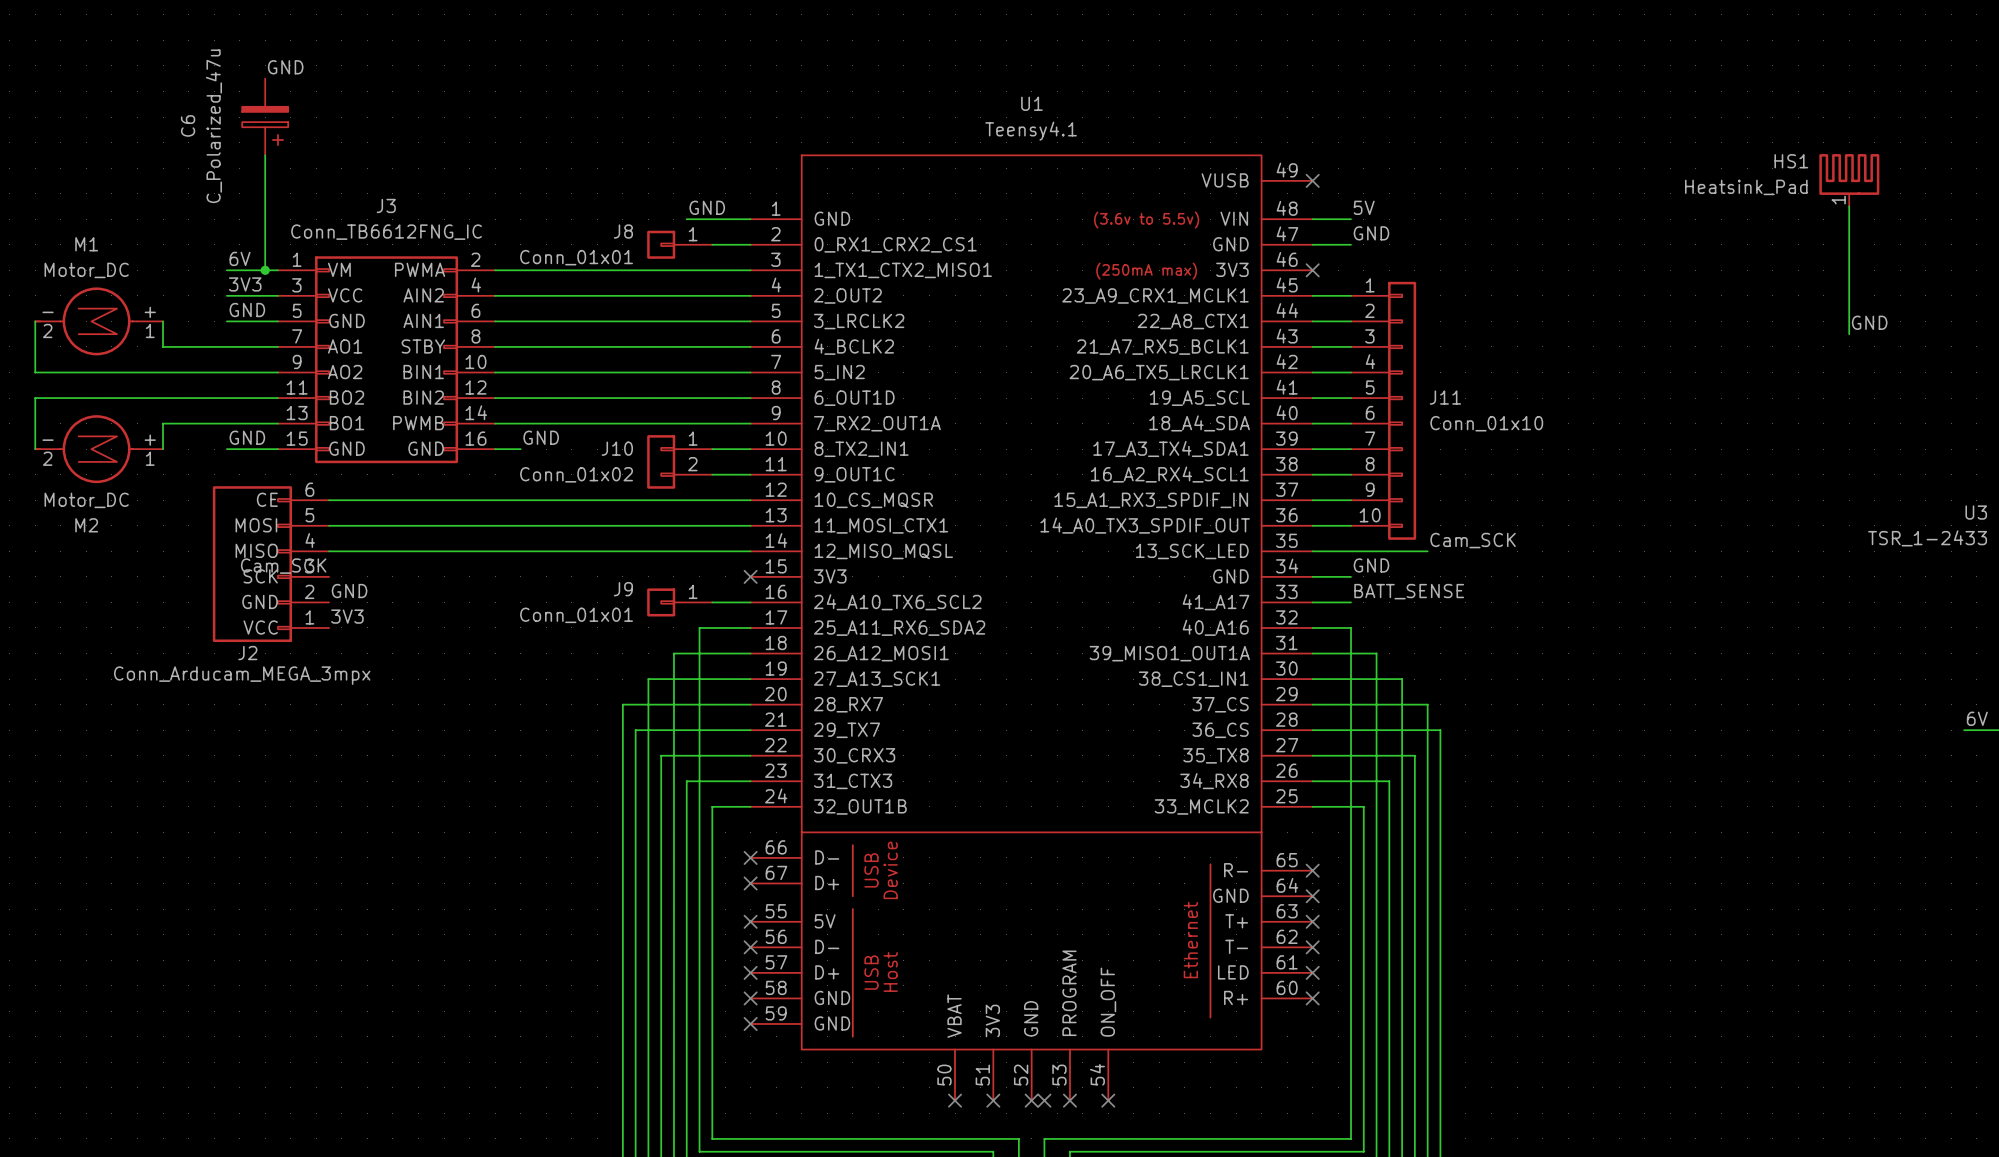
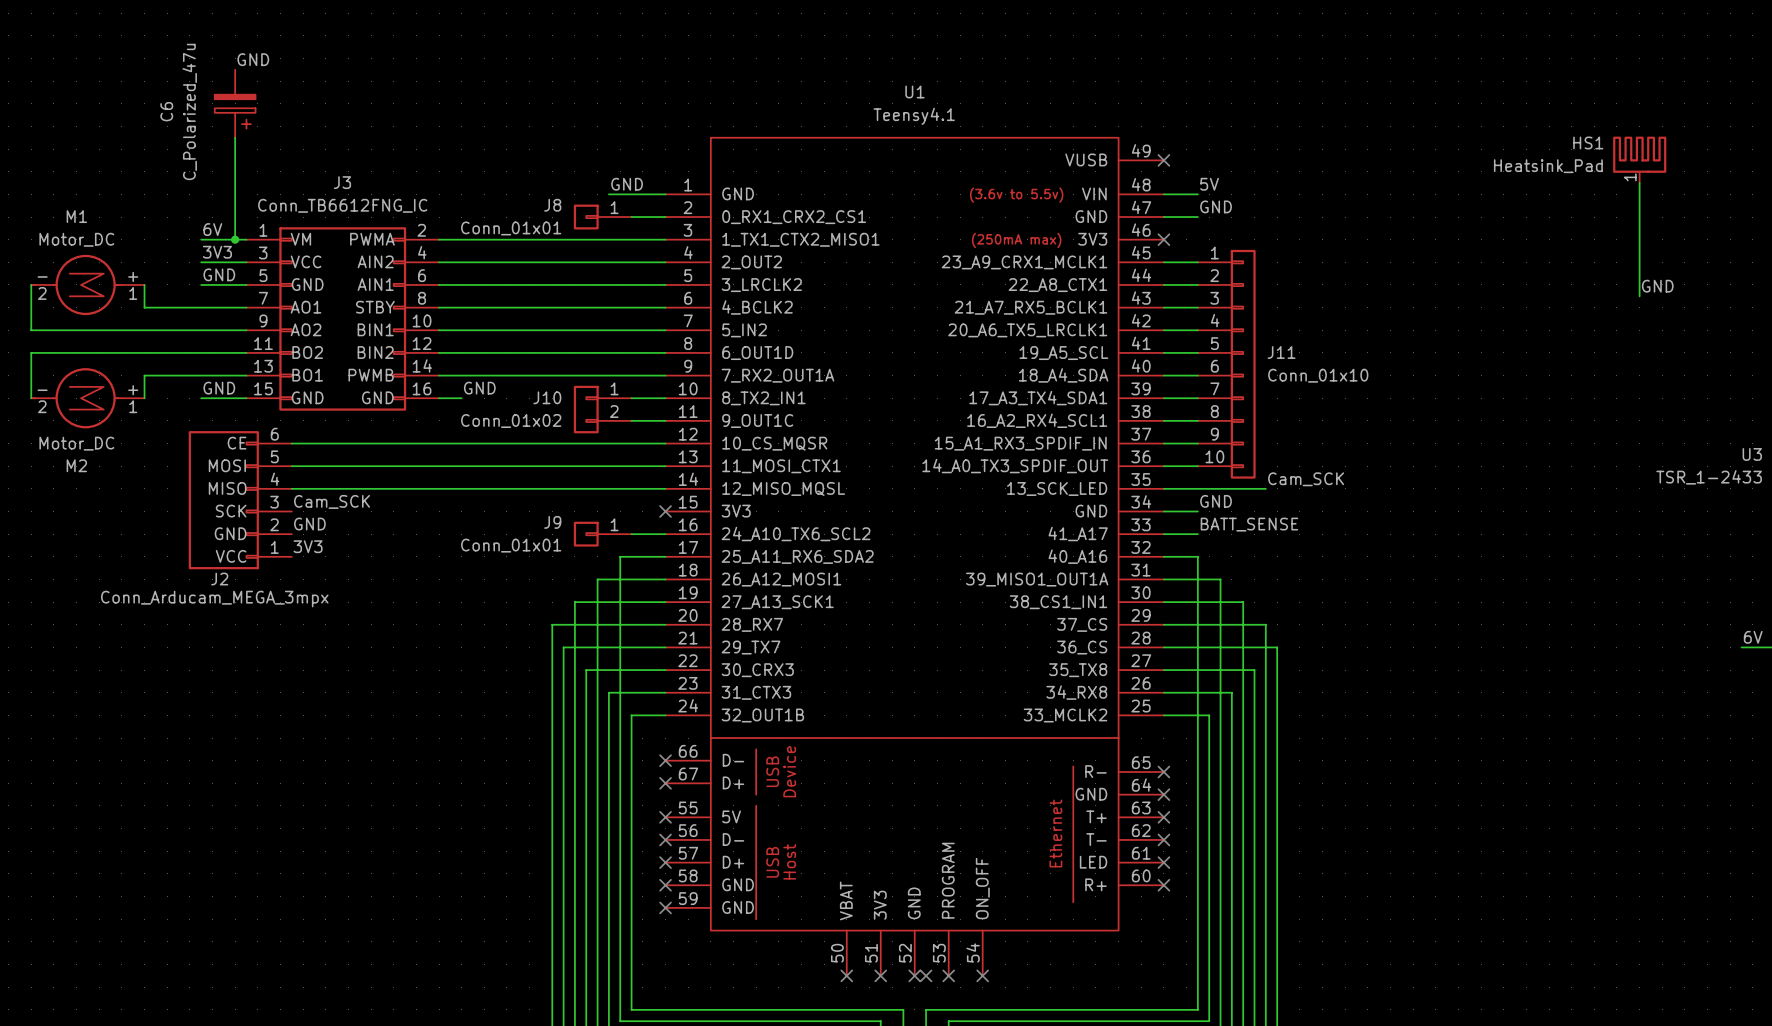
label position: Cam_SCK (283, 566) -> Cam_SCK (332, 501)

